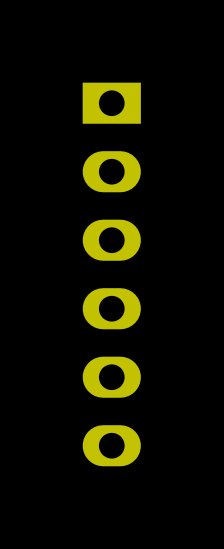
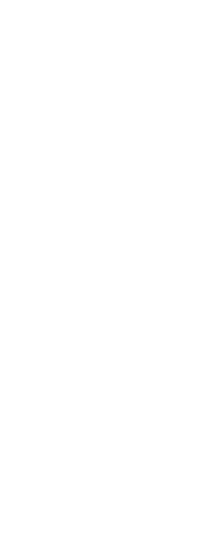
part: (111, 274) -> none

